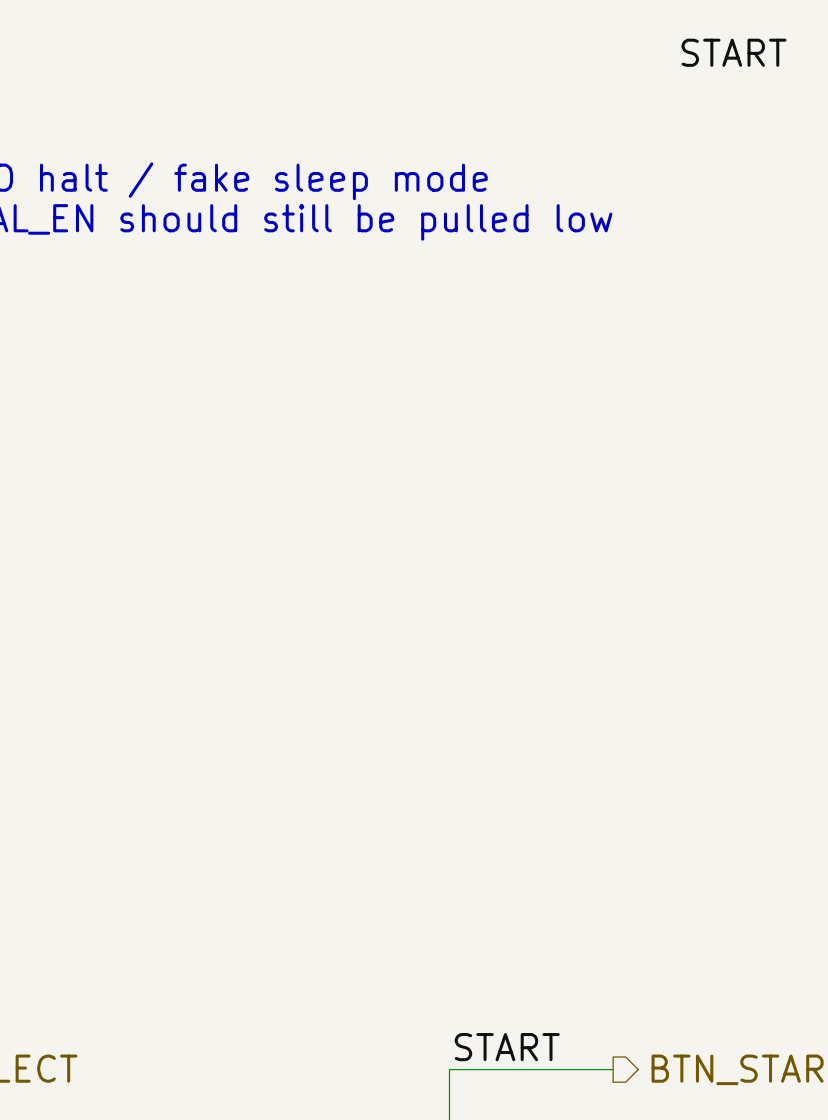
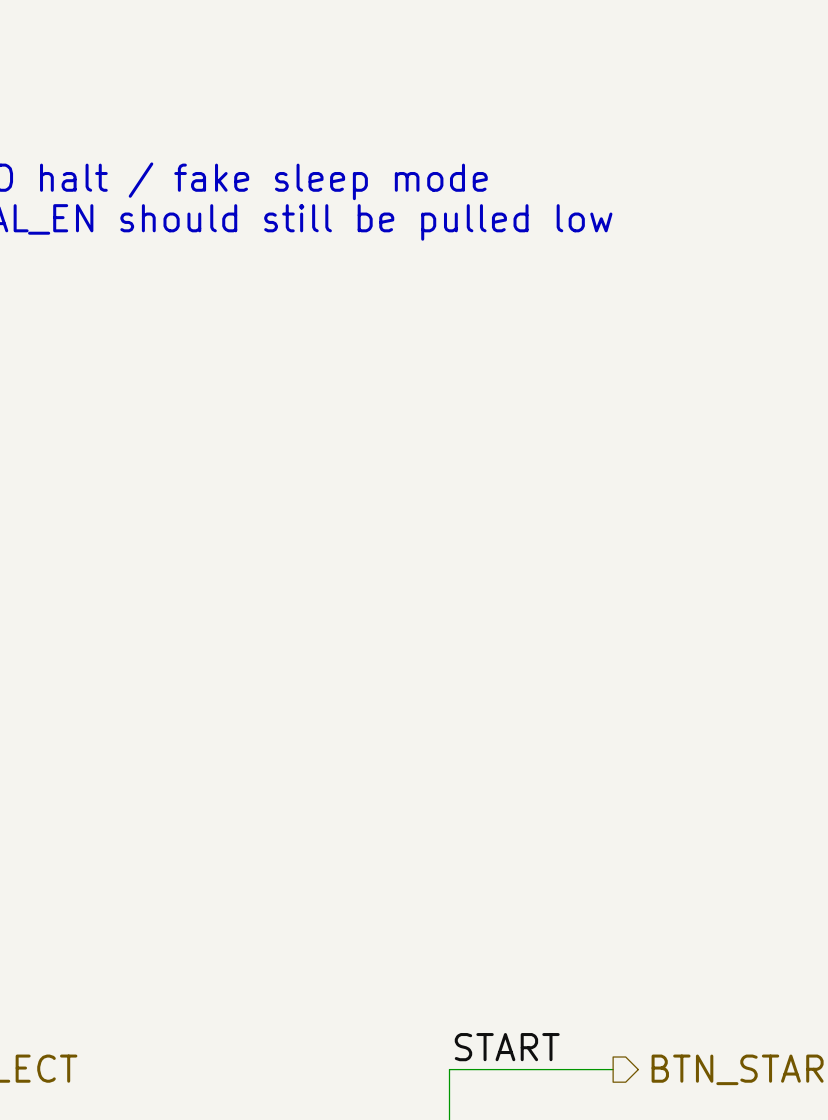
label: START (734, 52) -> none

